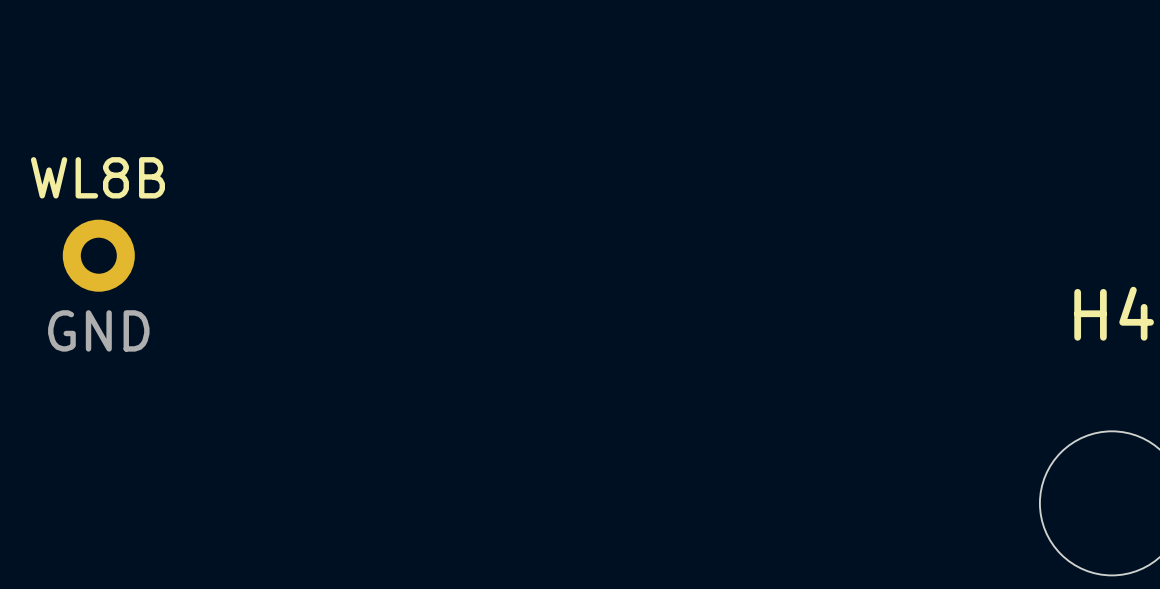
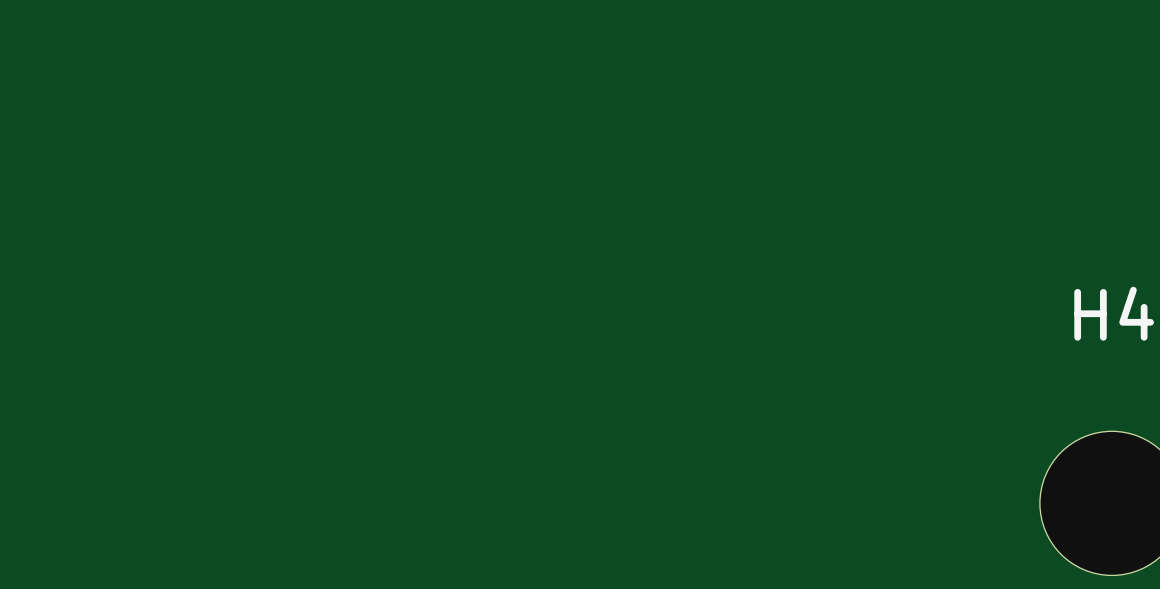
WL8B: GND (98, 255) -> none

